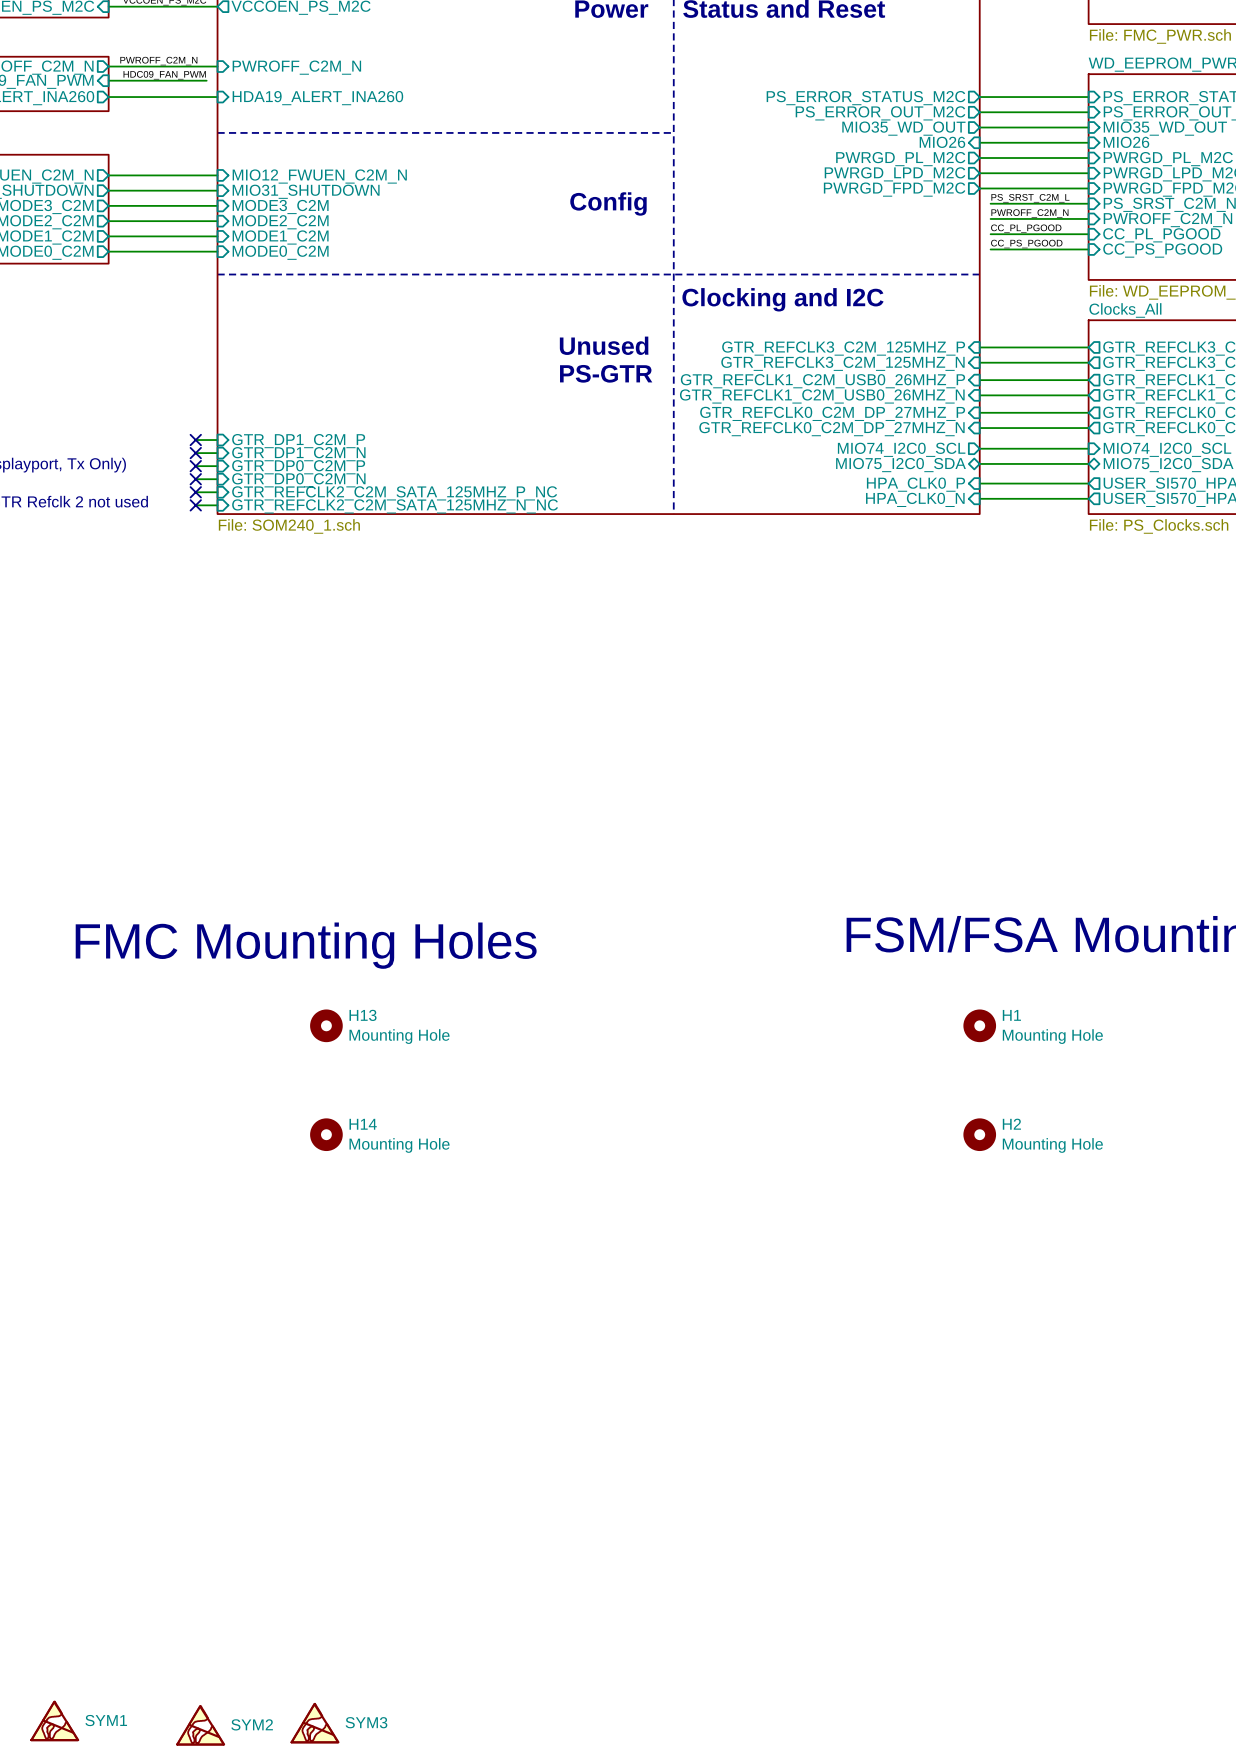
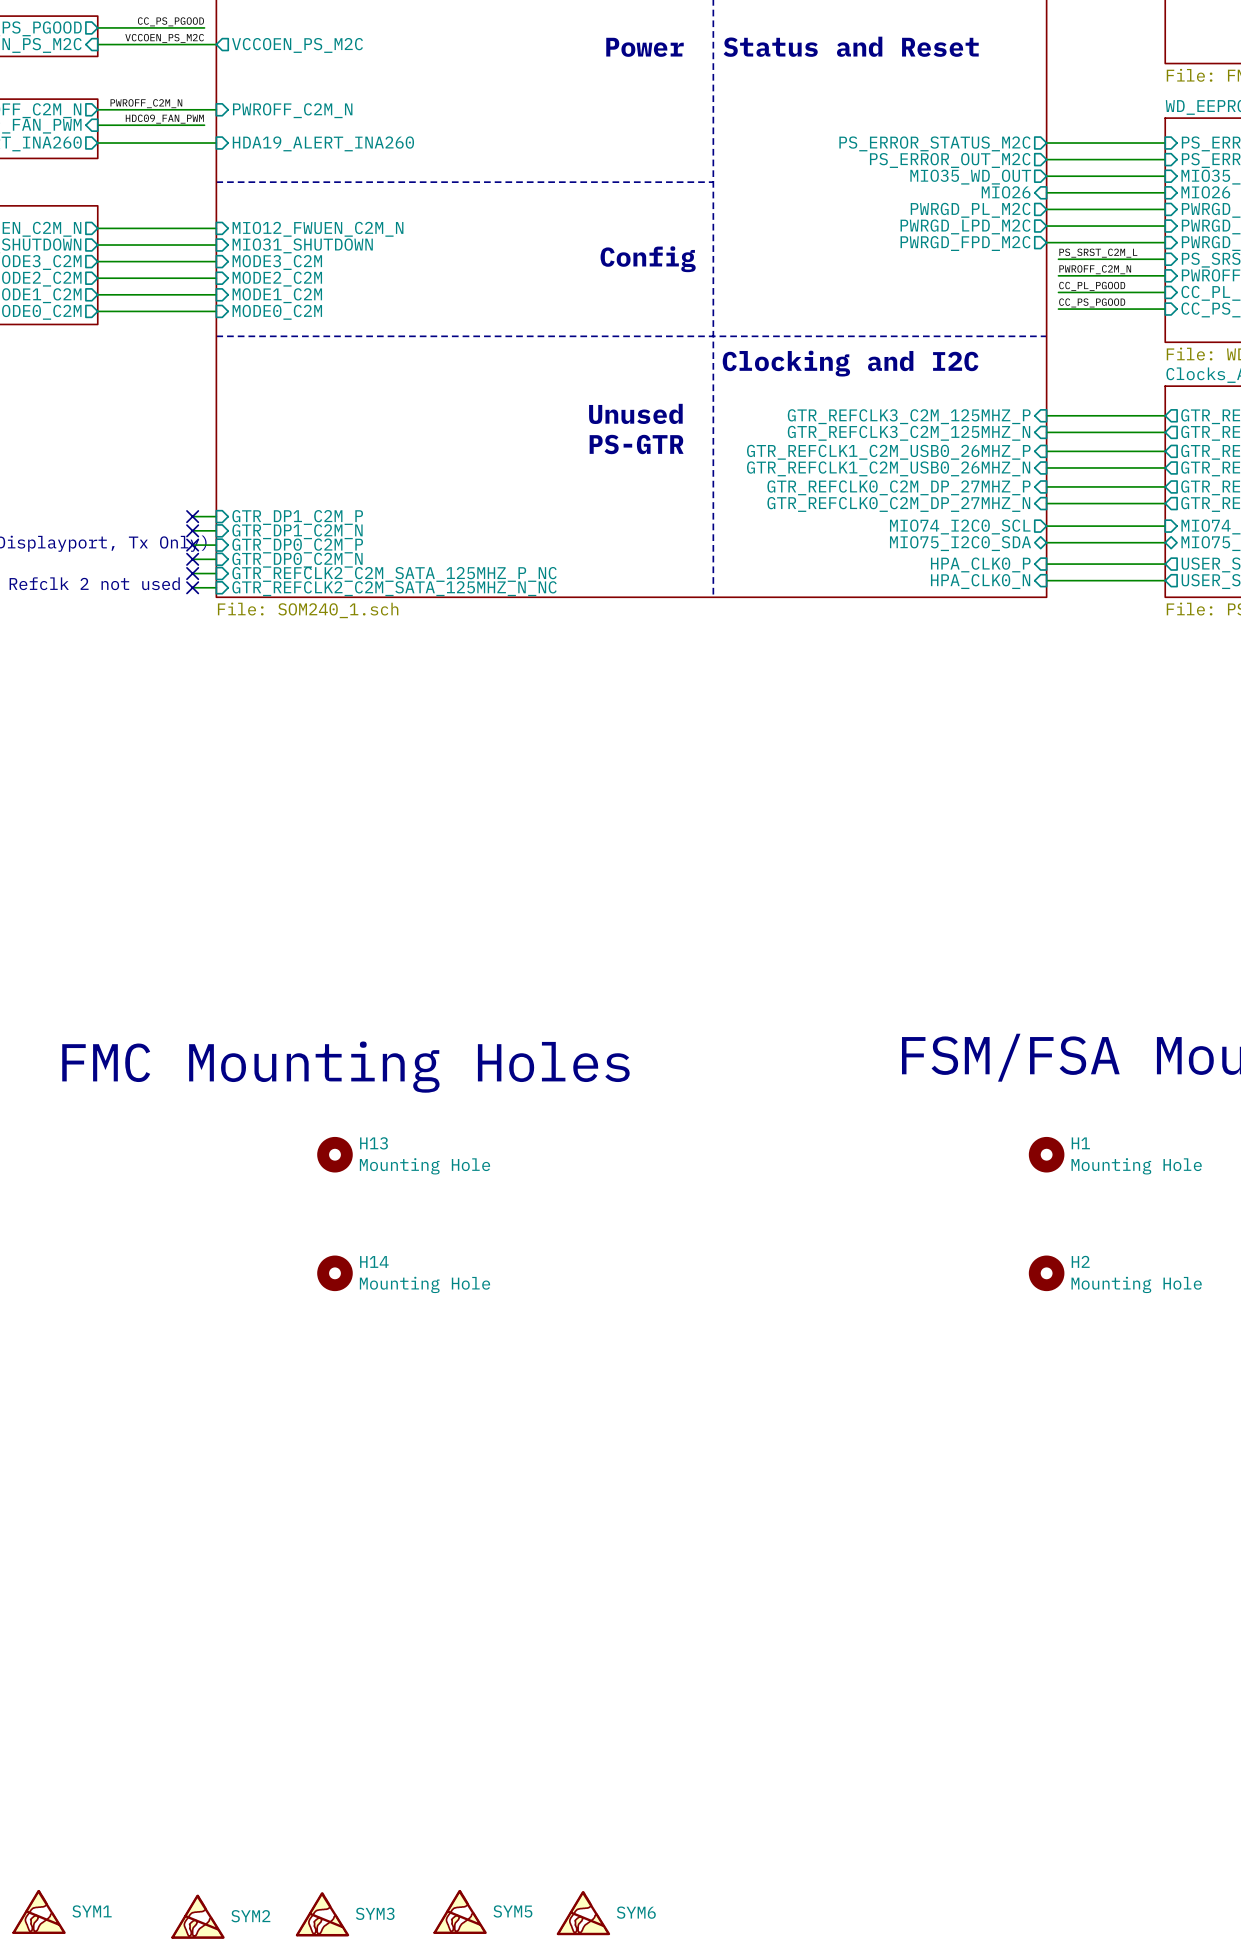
SYM5: none -> (460, 1912)
SYM6: none -> (583, 1913)

